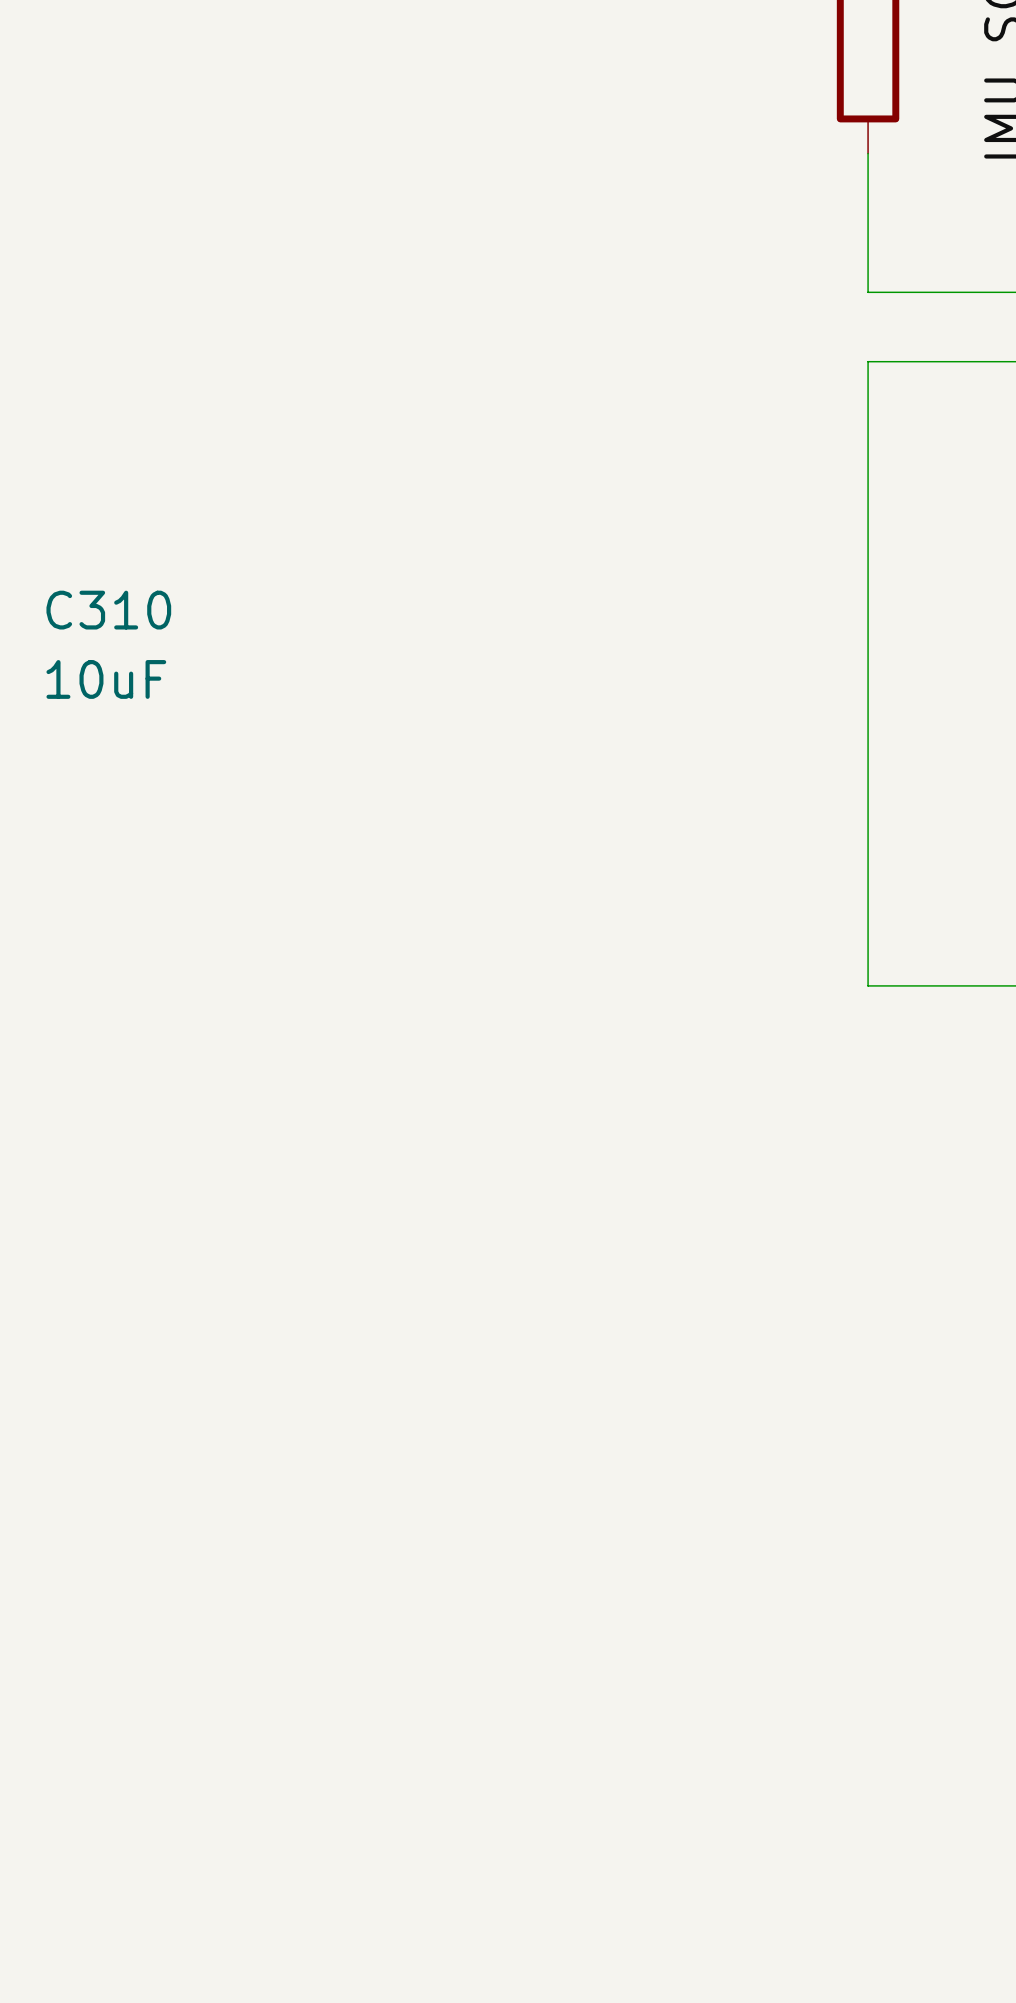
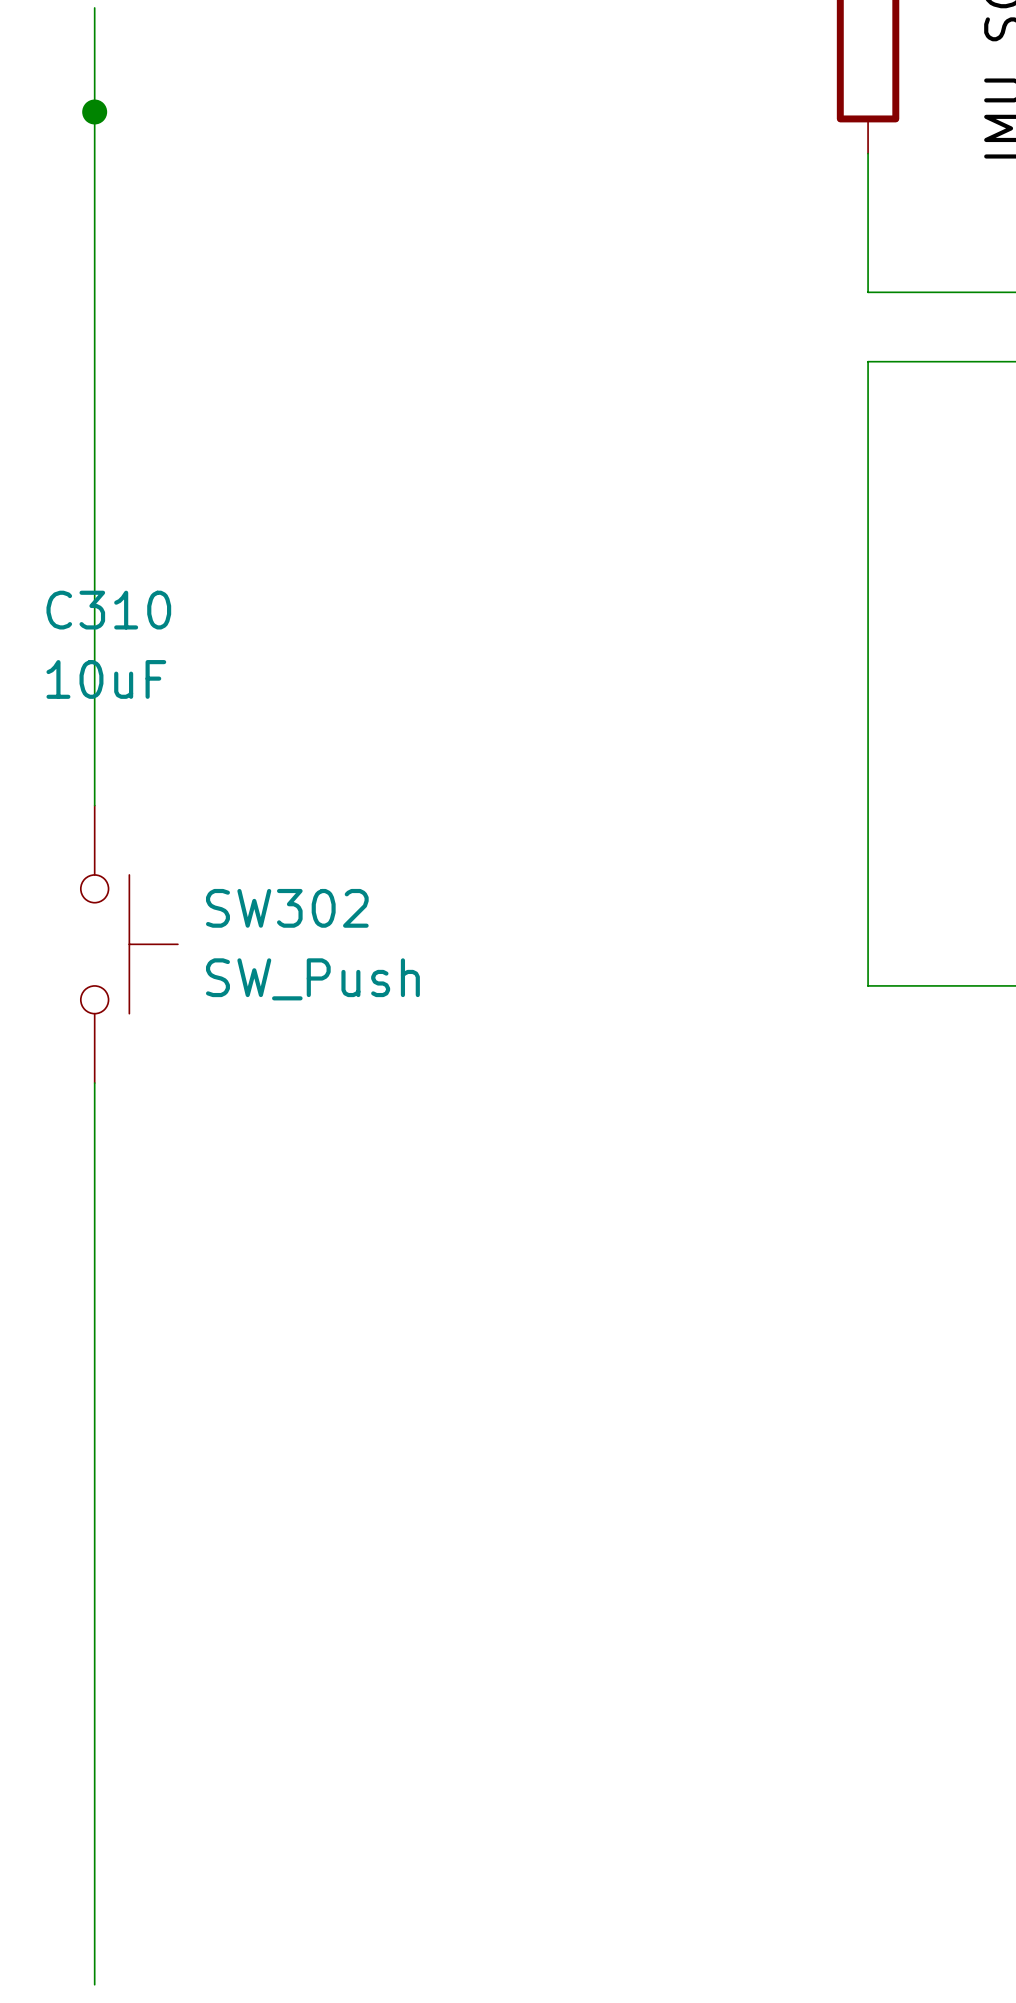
wire: none -> (94, 7) (94, 805)
junction: none -> (94, 111)
SW302: none -> SW_Push (129, 944)
wire: none -> (94, 1083) (94, 1984)

